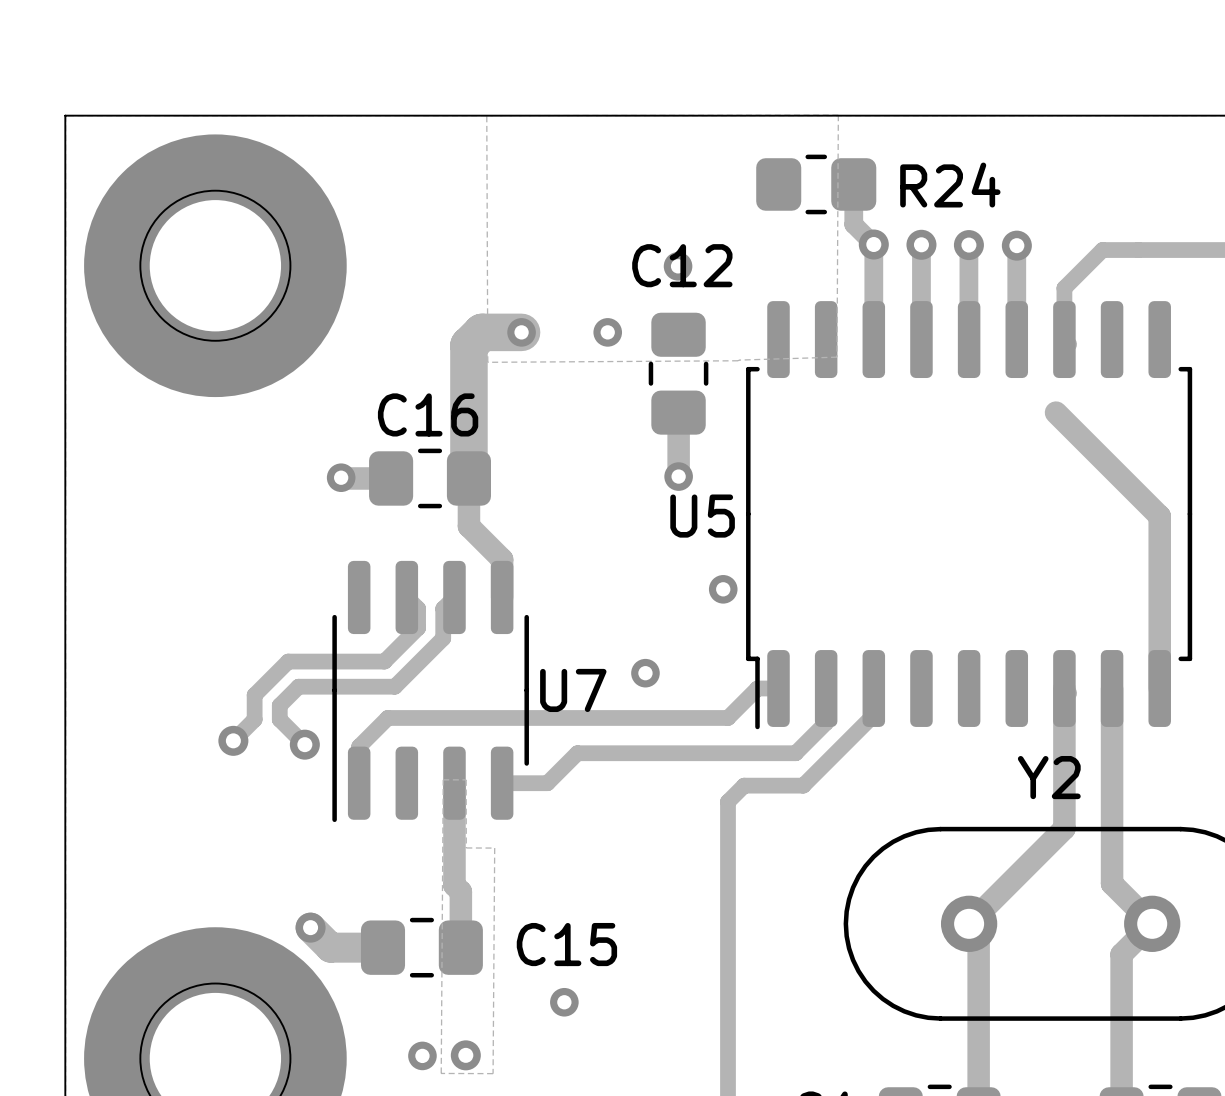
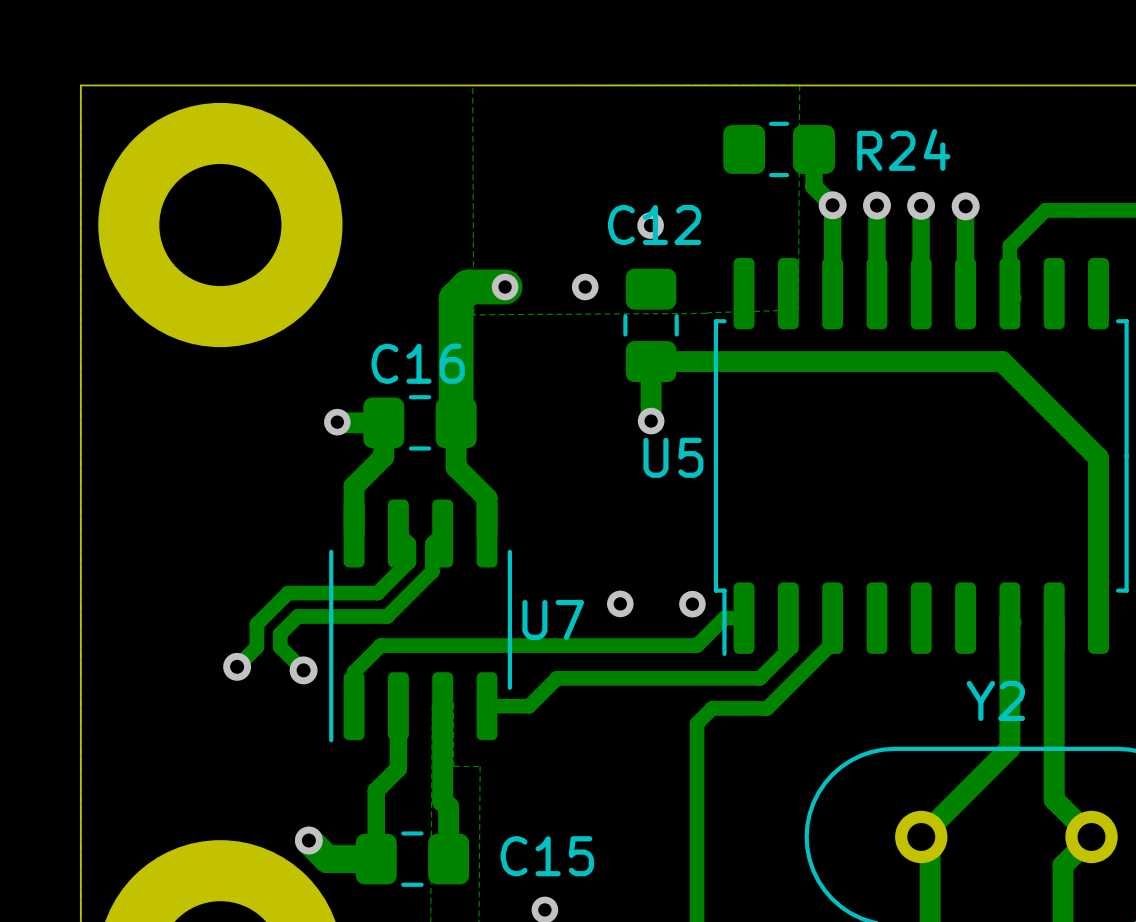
track: none -> (1002, 361) (651, 361)
track: none -> (383, 422) (383, 456) (354, 486) (354, 533)
via position: (723, 589) -> (692, 604)
track: none -> (398, 706) (398, 768) (376, 790) (376, 859)

